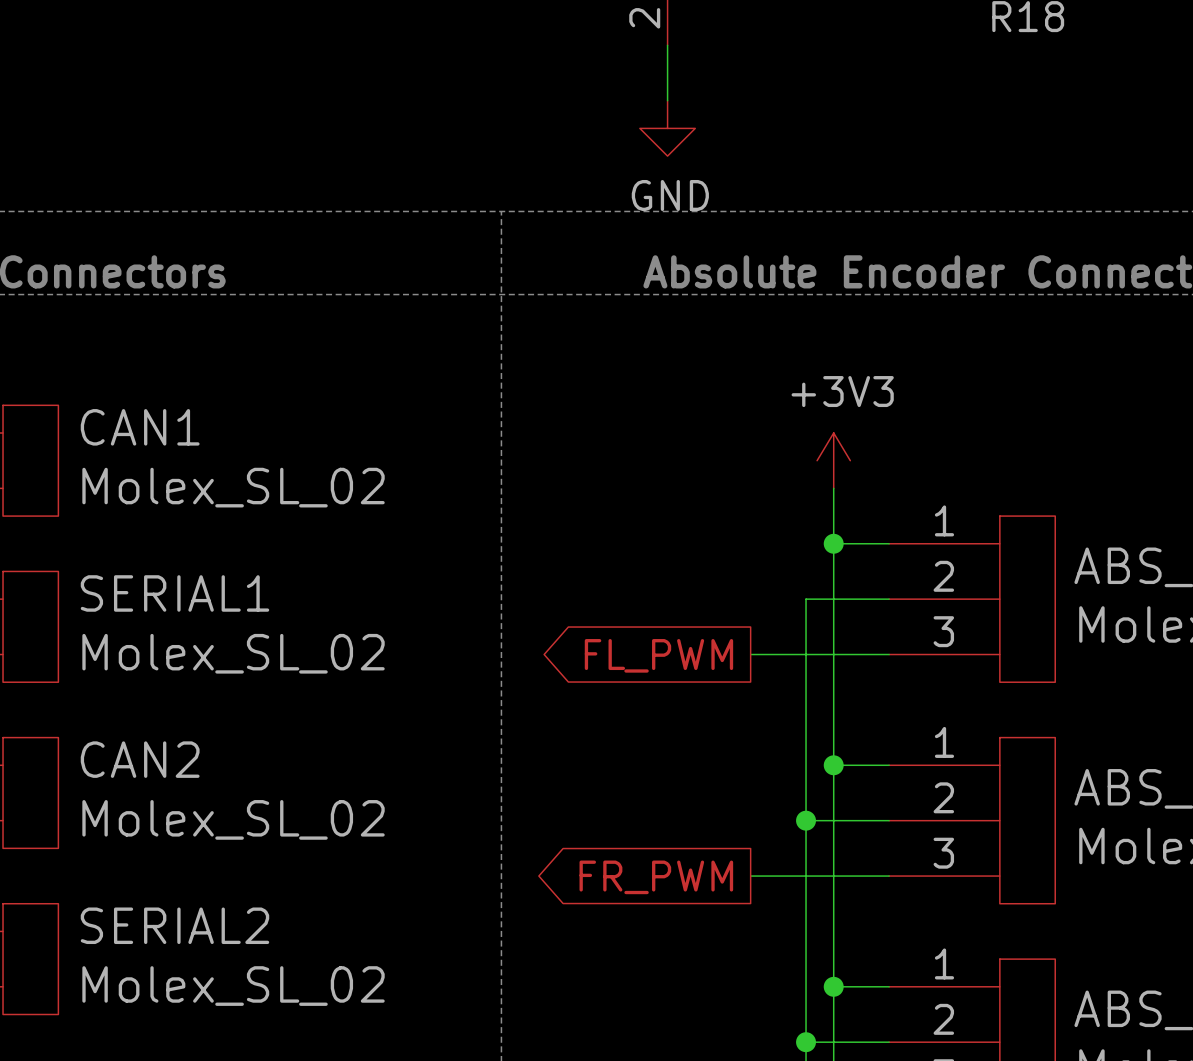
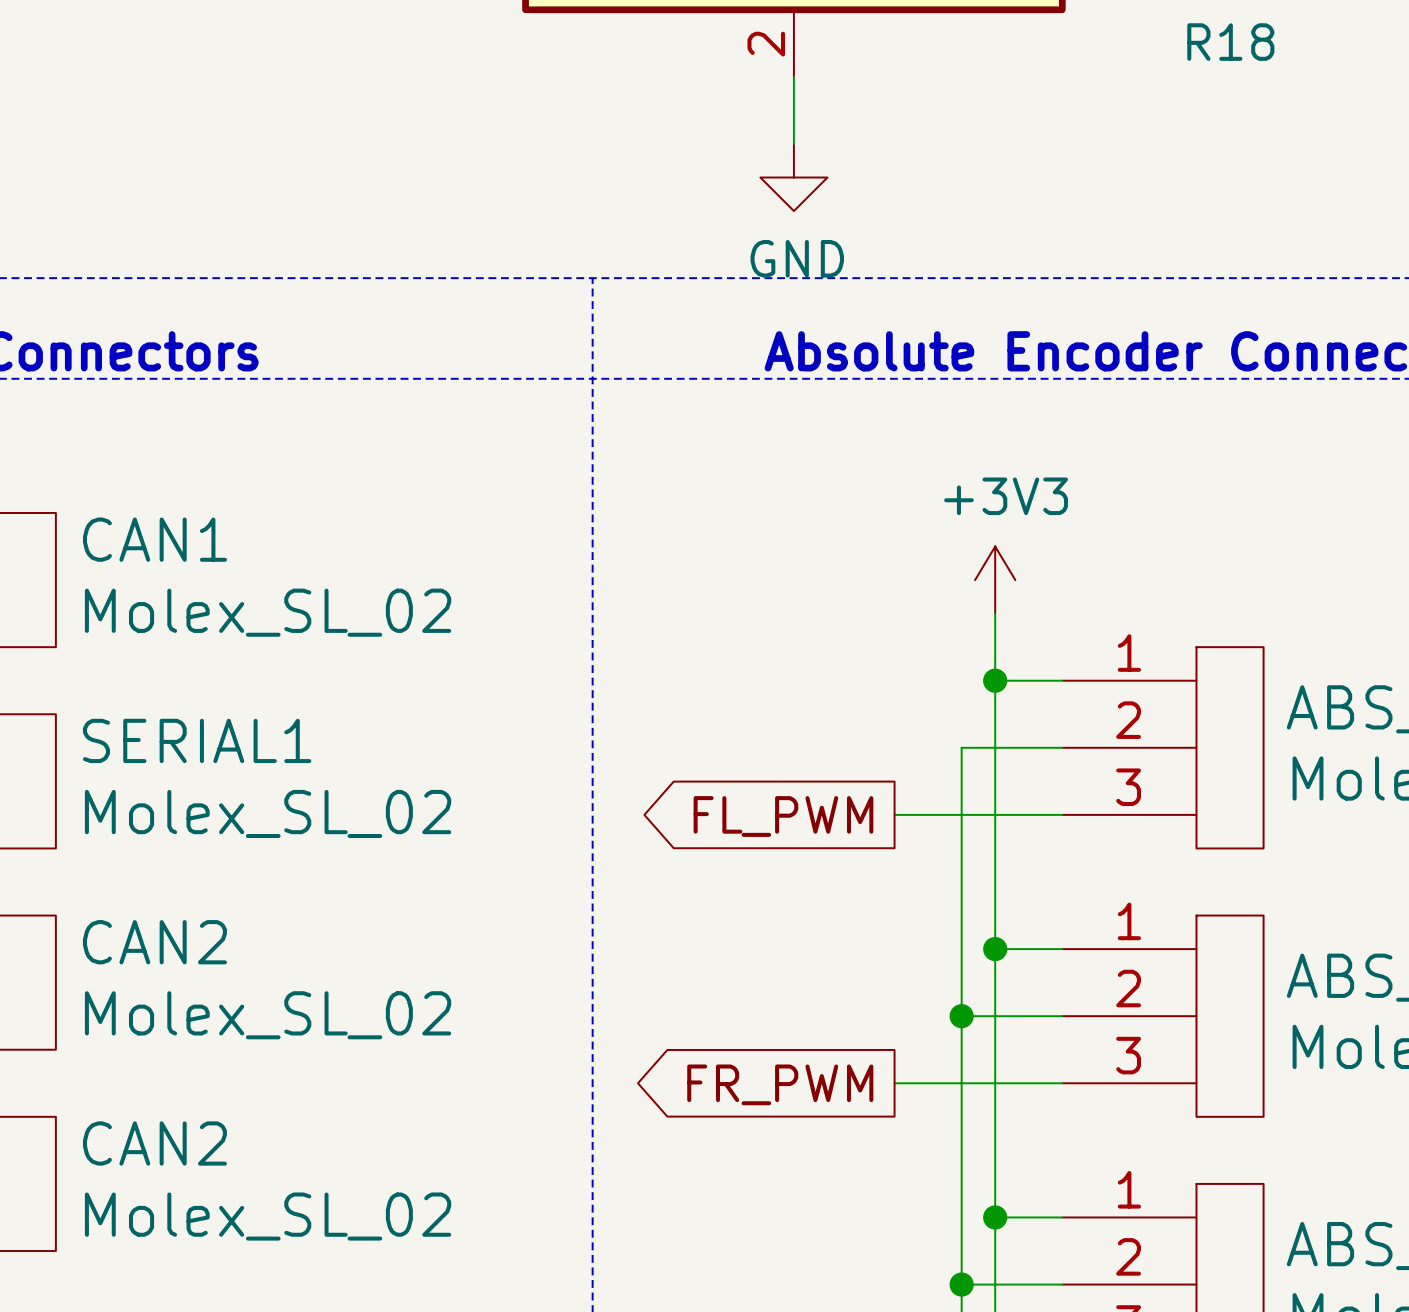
SERIAL2 name: SERIAL2 (174, 925) -> CAN2 (154, 1143)

